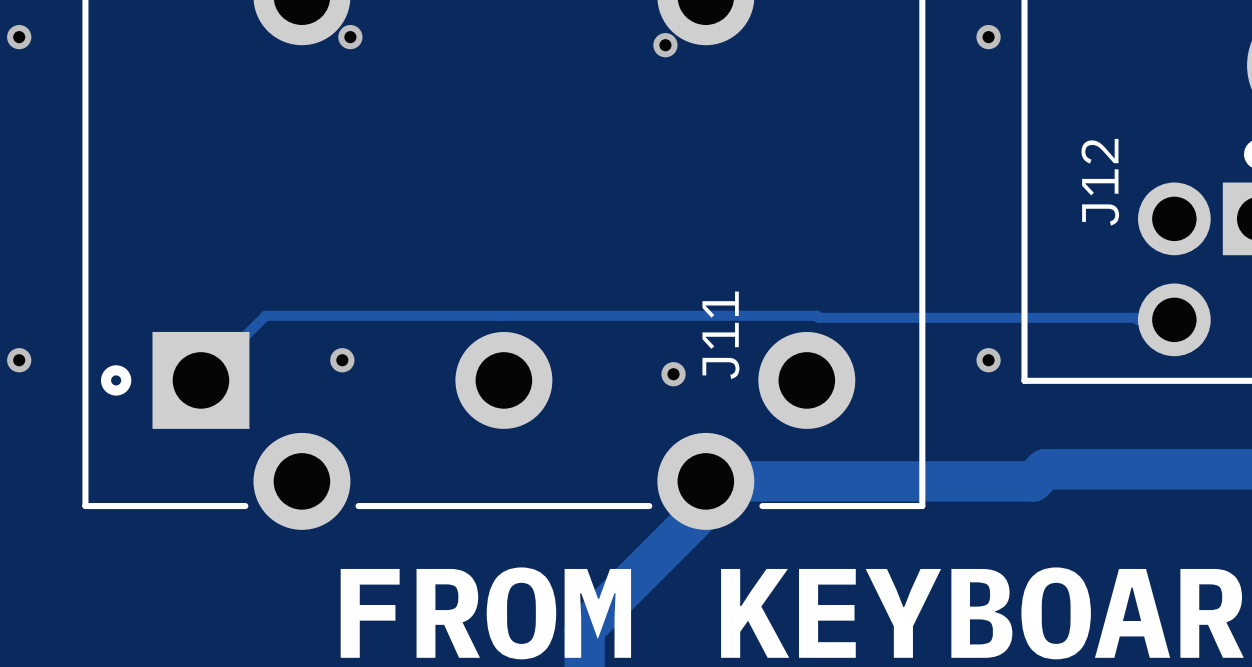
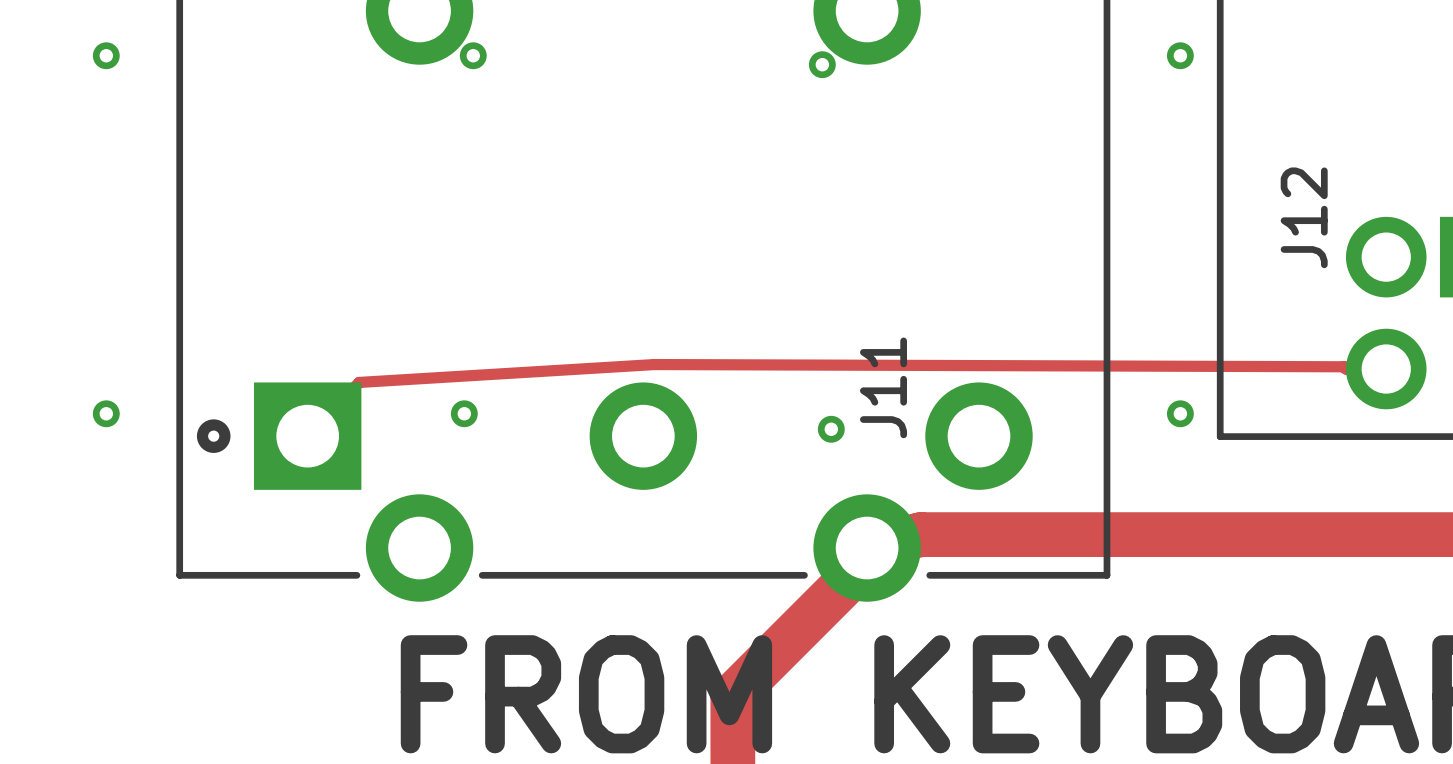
track: (1135, 317) (265, 315) (200, 380) -> (1386, 369) (1343, 366) (654, 364) (359, 382) (307, 436)
track: (1045, 469) (1032, 481) (705, 481) -> (1243, 534) (920, 534) (867, 548) (867, 561) (732, 695) (732, 711)
track: (705, 507) (584, 628) -> none

